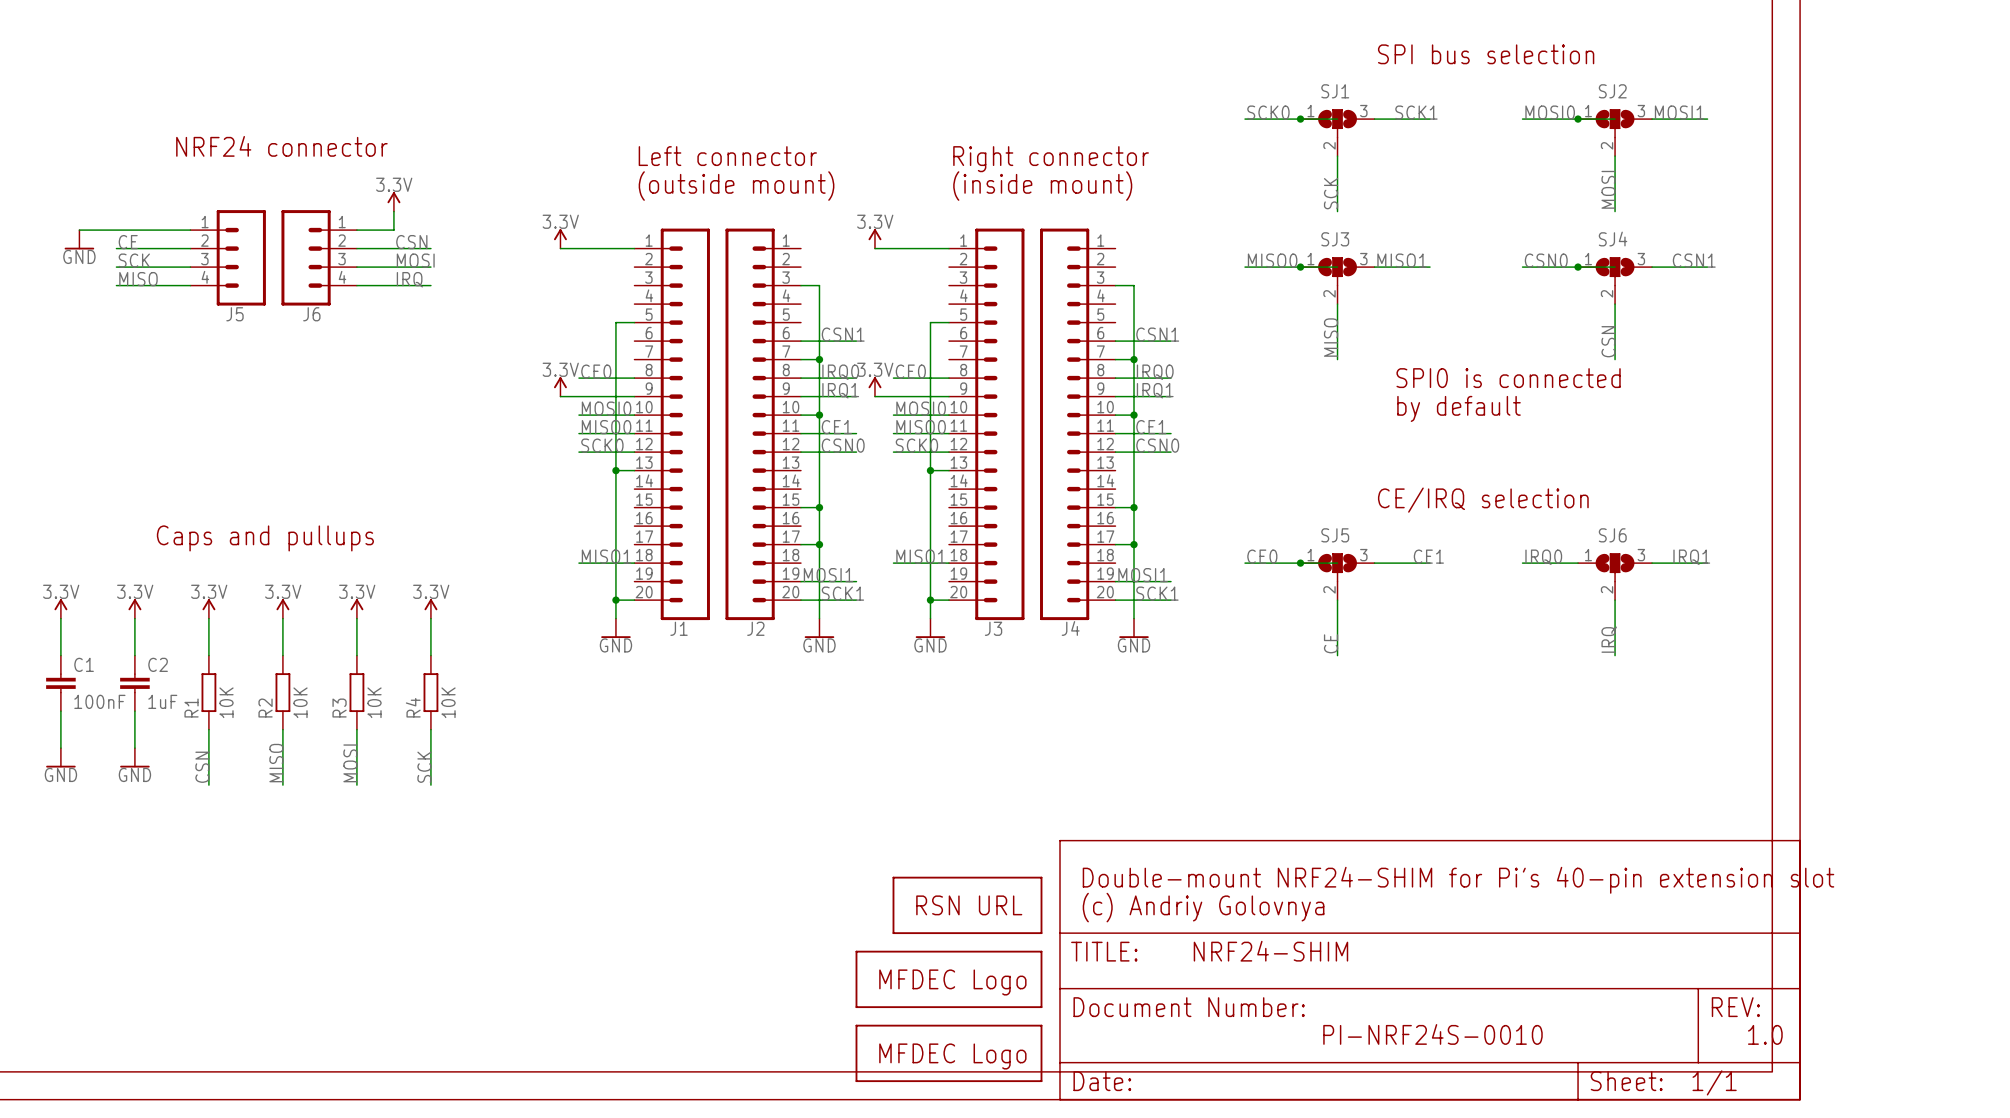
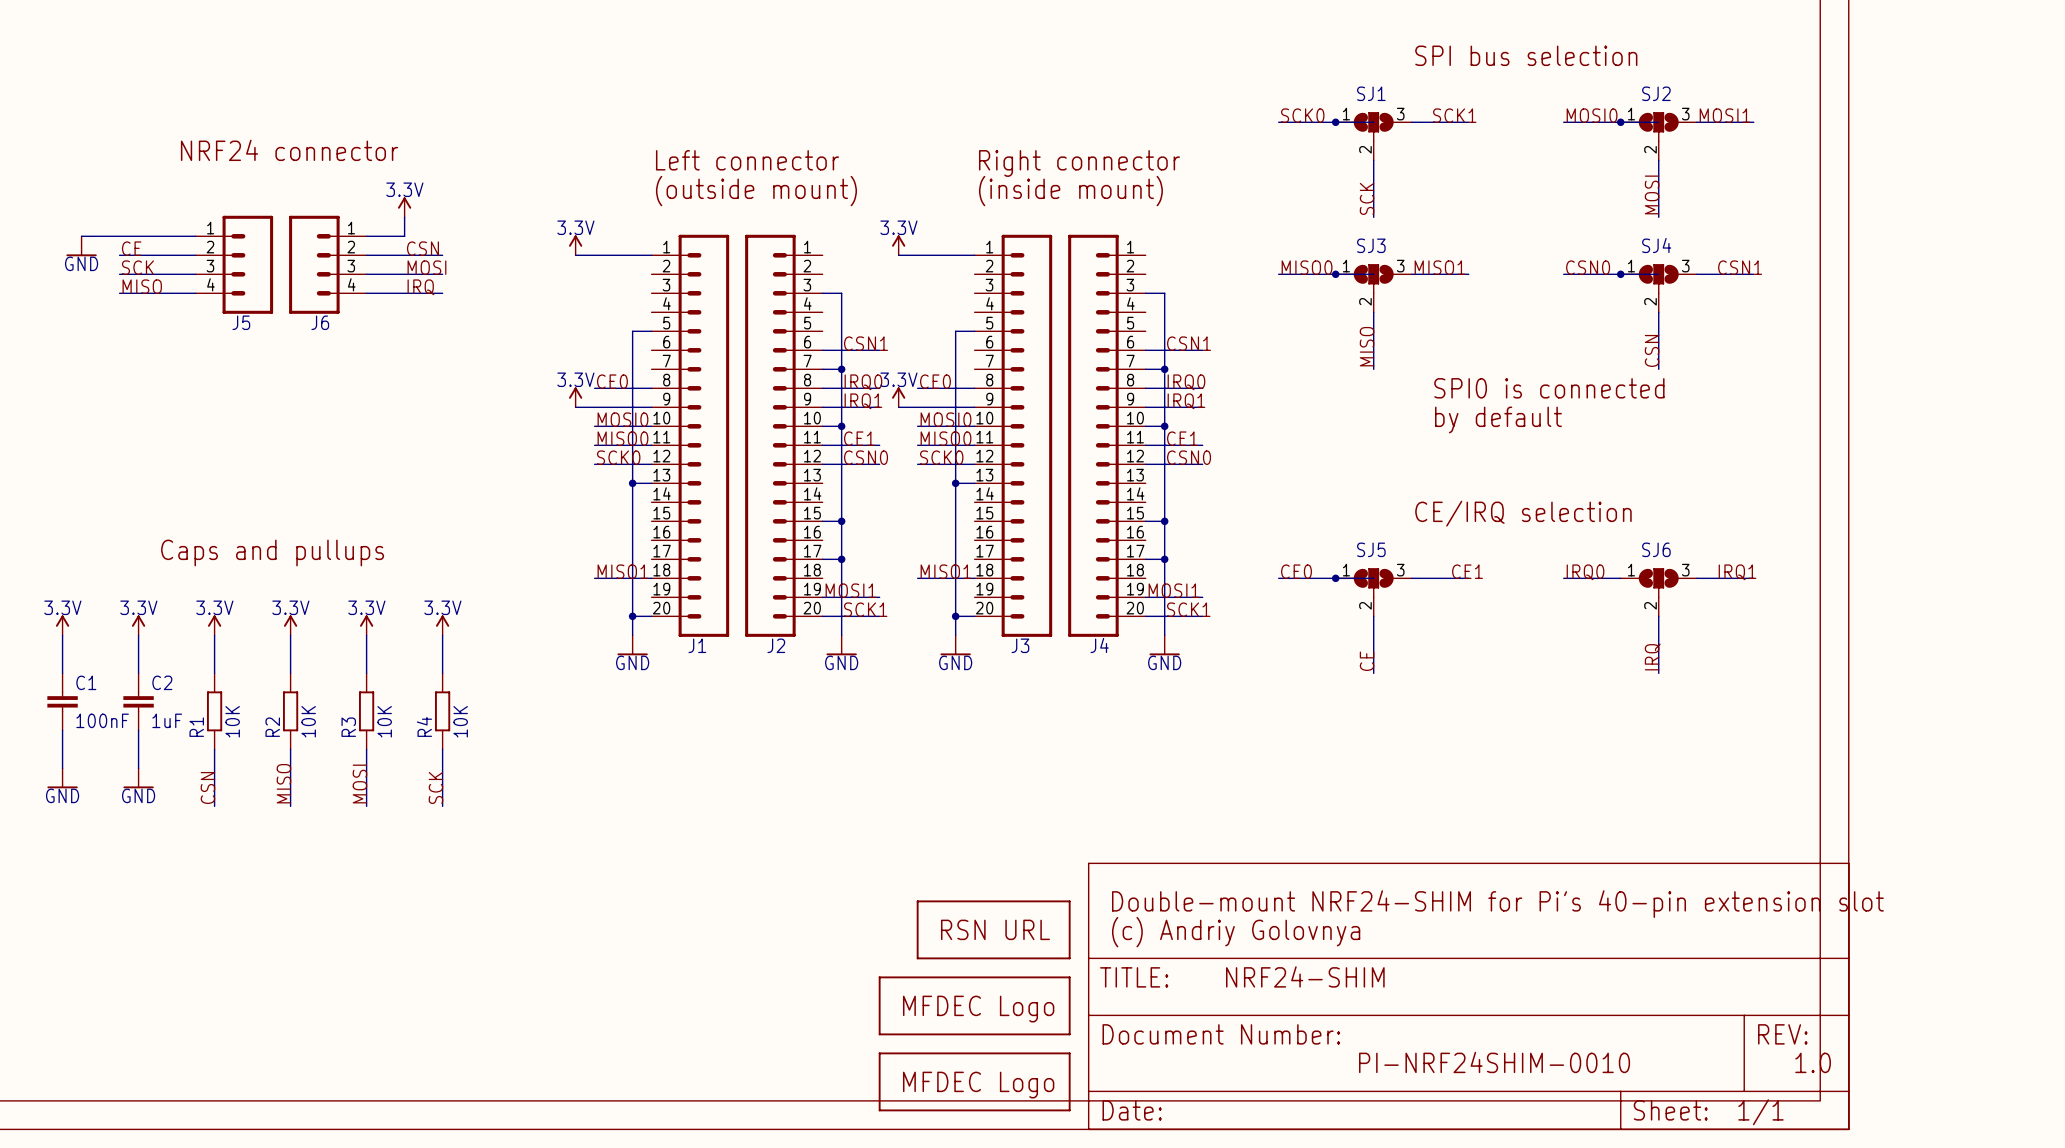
text: PI-NRF24S-0010 (1432, 1034) -> PI-NRF24SHIM-0010 (1494, 1062)

